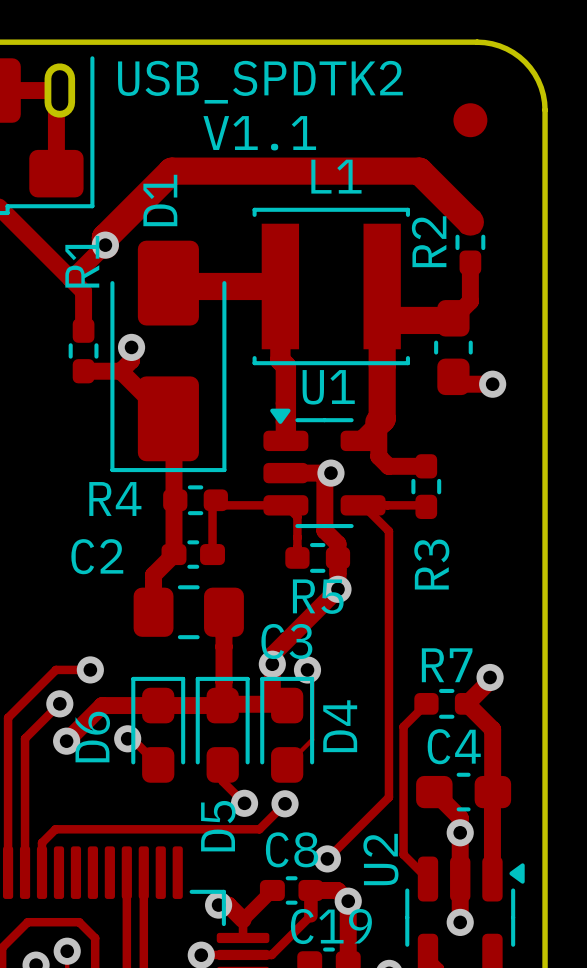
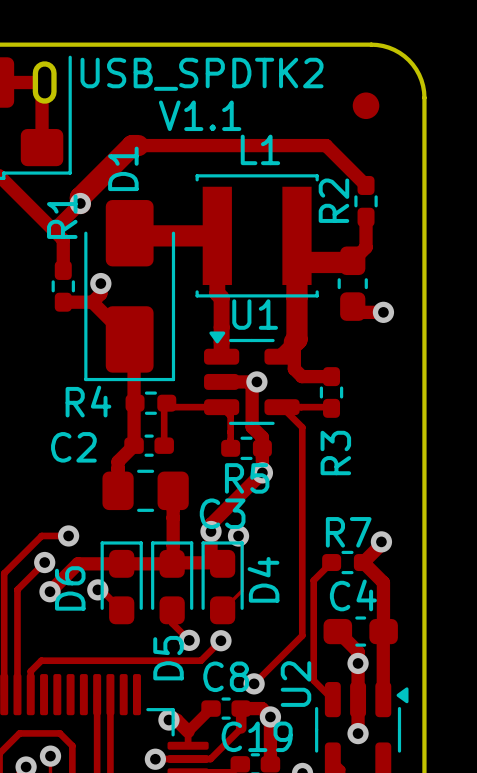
track width: thick (179, 171) (419, 171) (470, 222) -> thin (138, 145) (326, 145) (366, 185)

